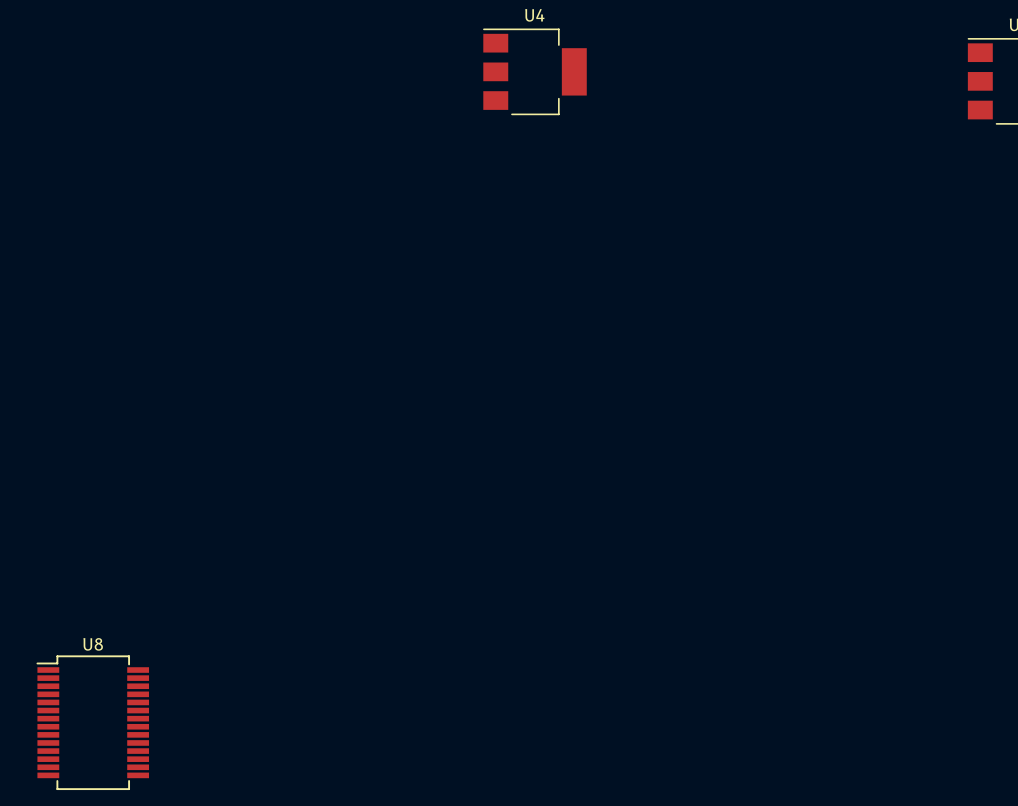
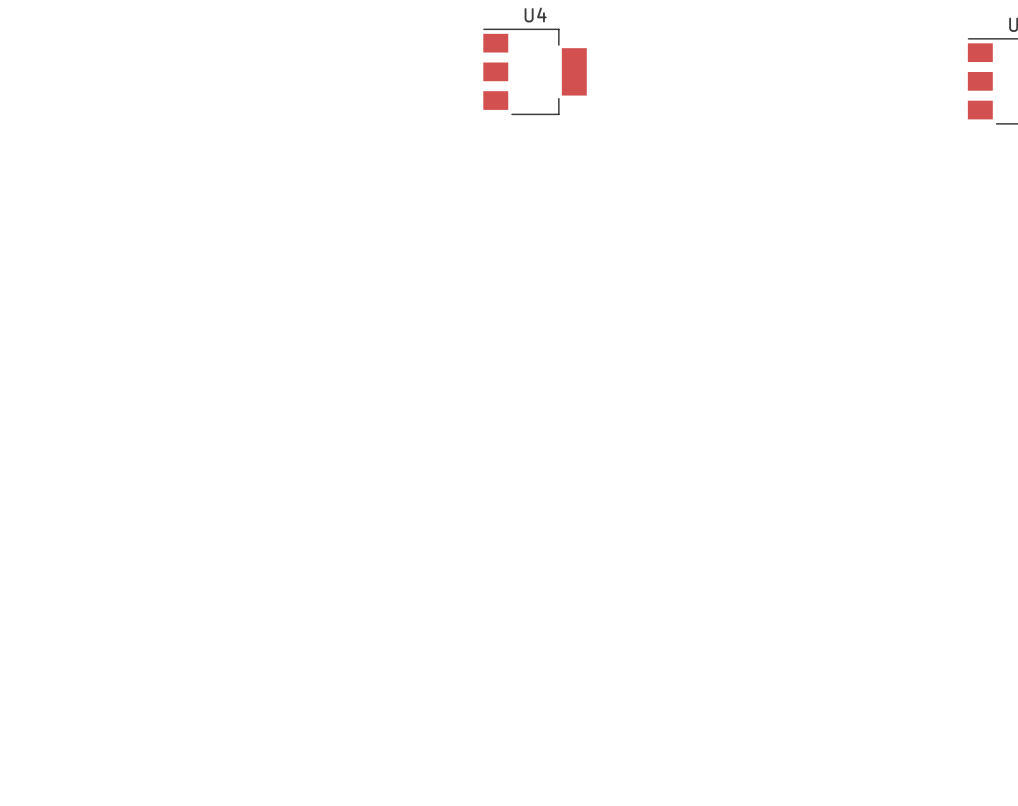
U8: (92, 722) -> none

